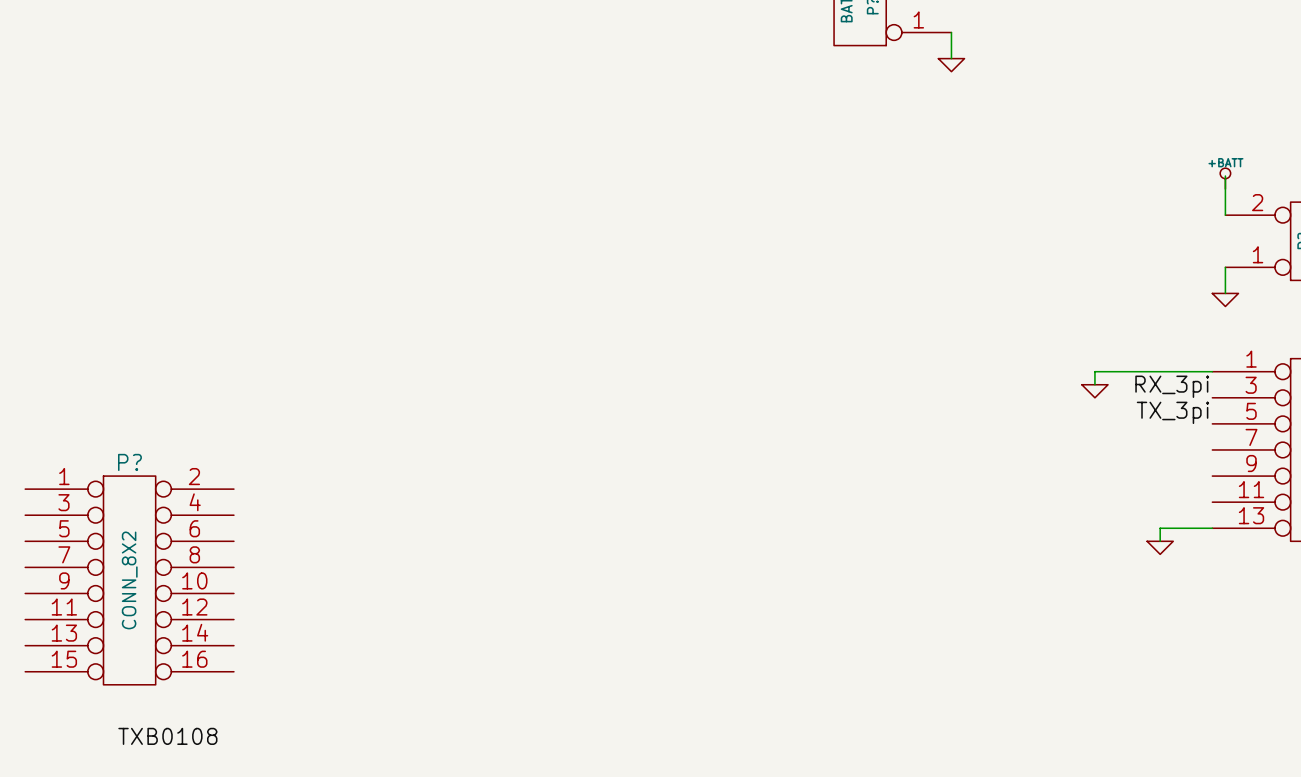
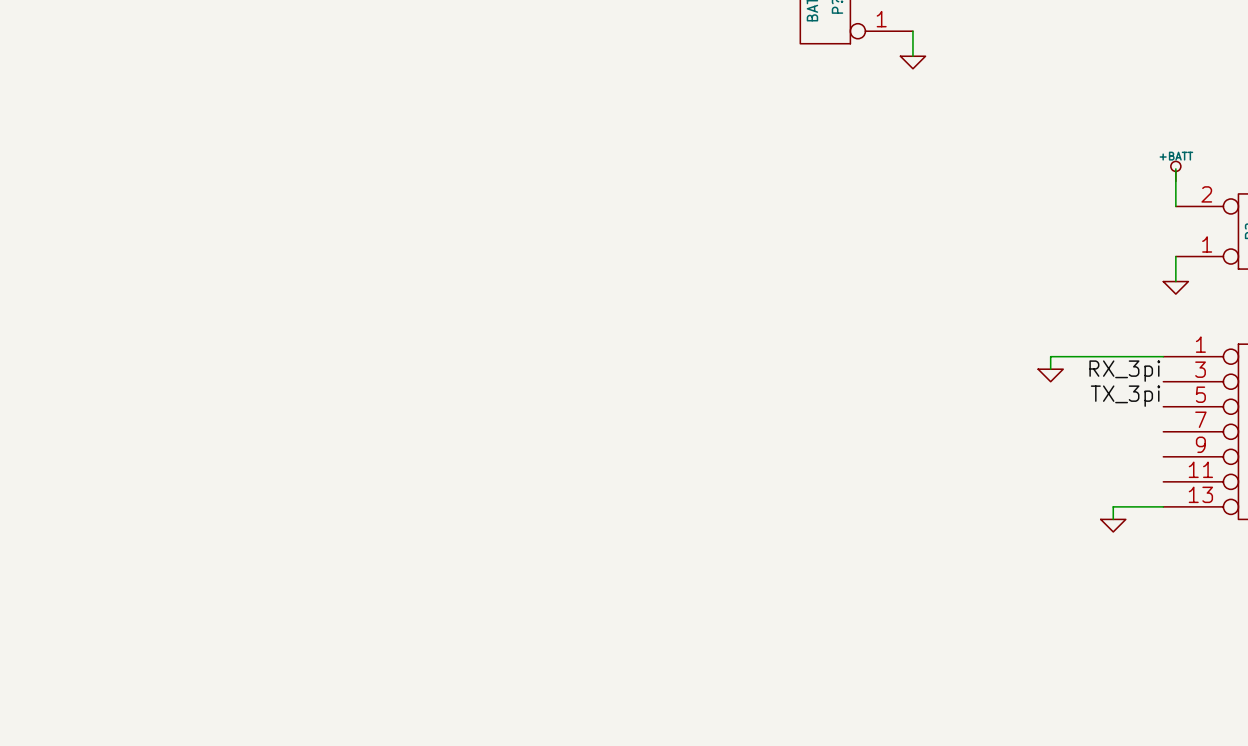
P?: CONN_8X2 (129, 580) -> none
label: TXB0108 (167, 736) -> none

